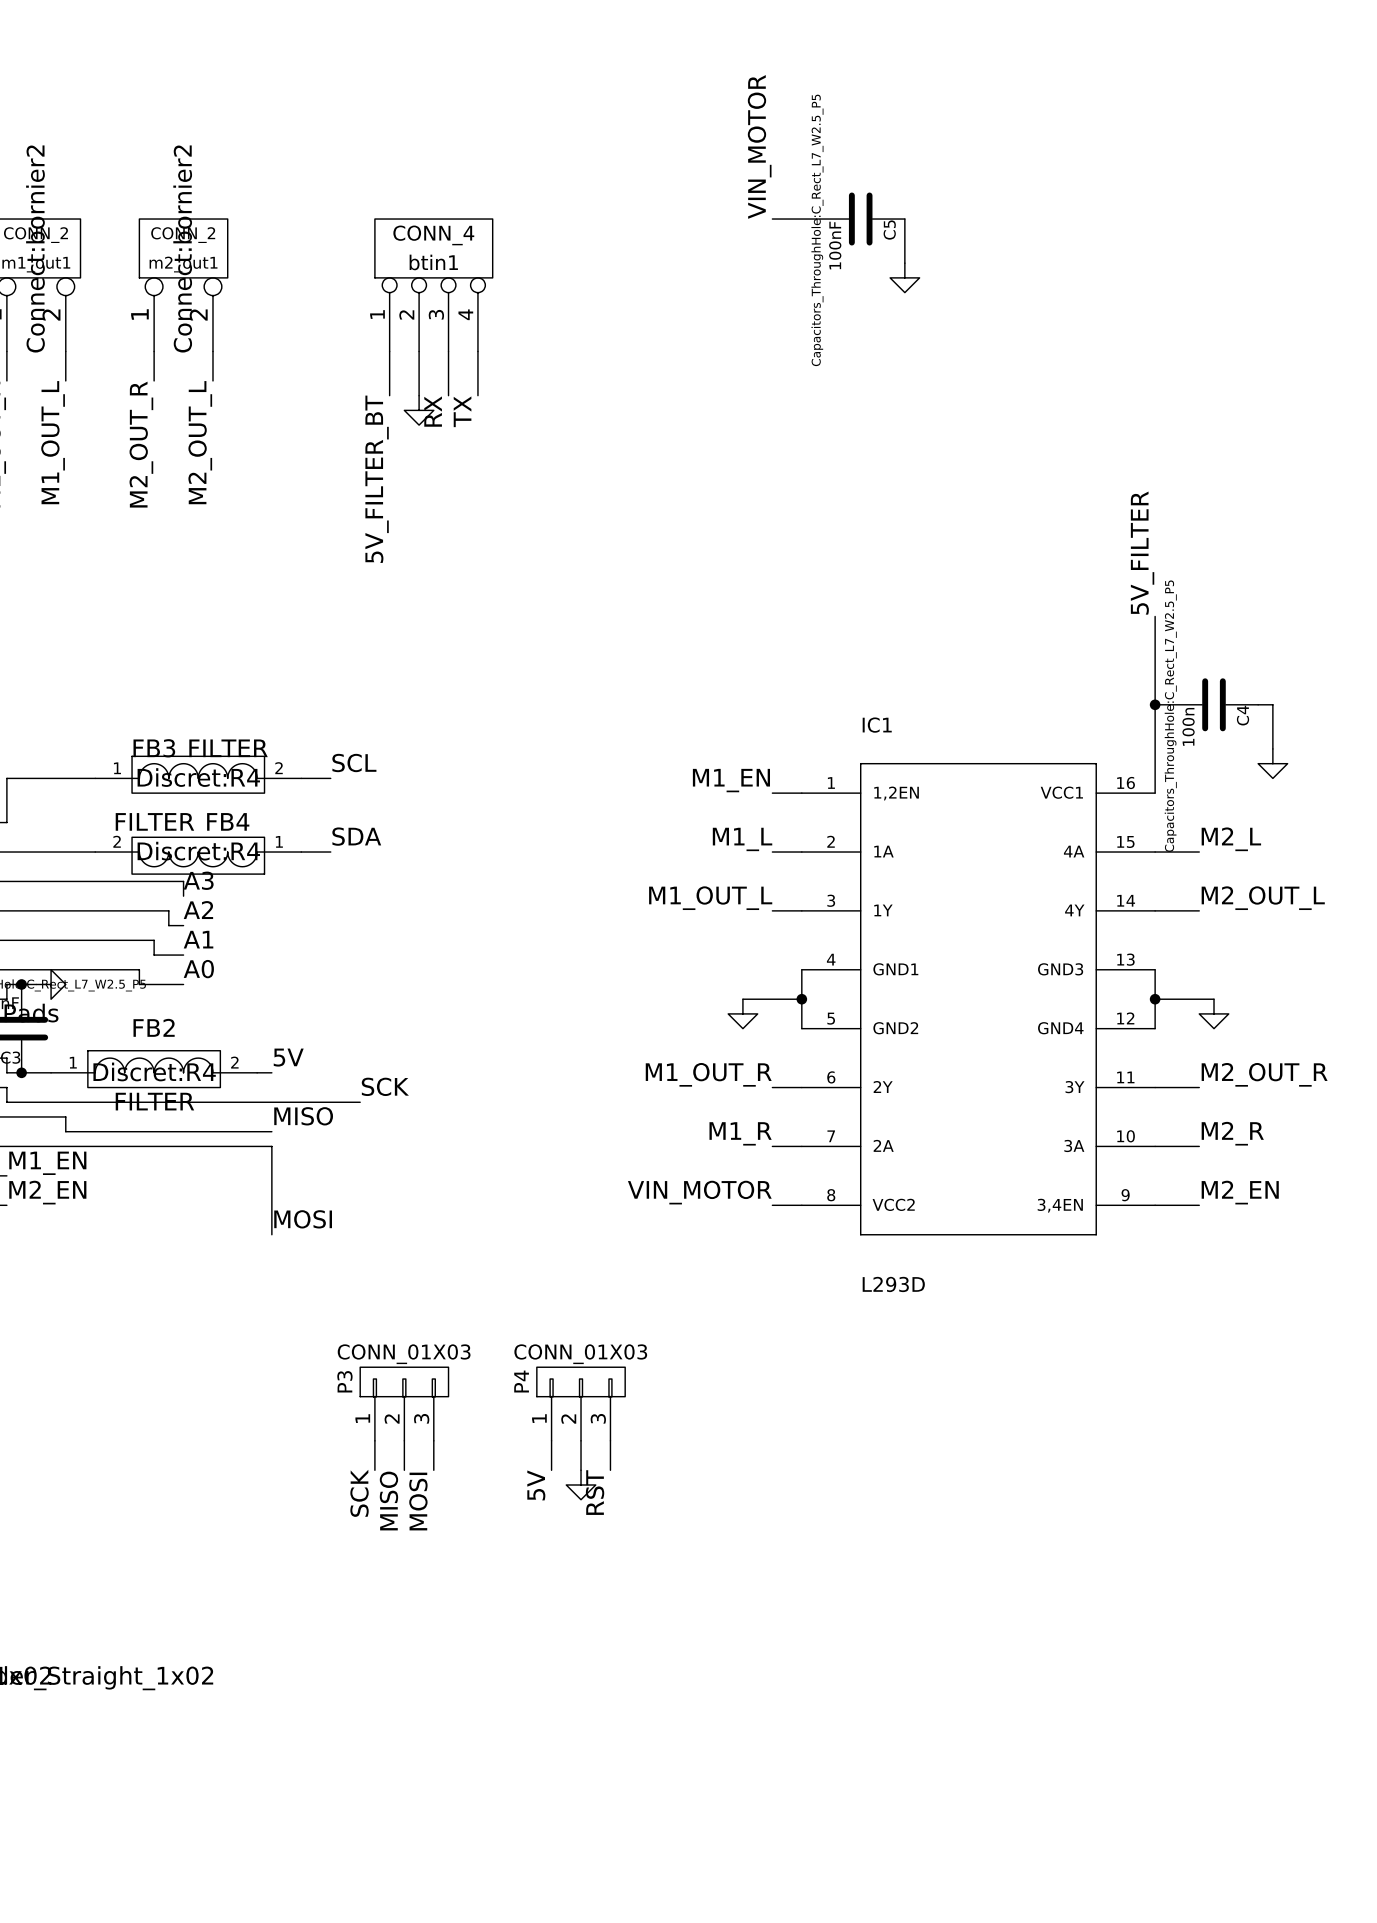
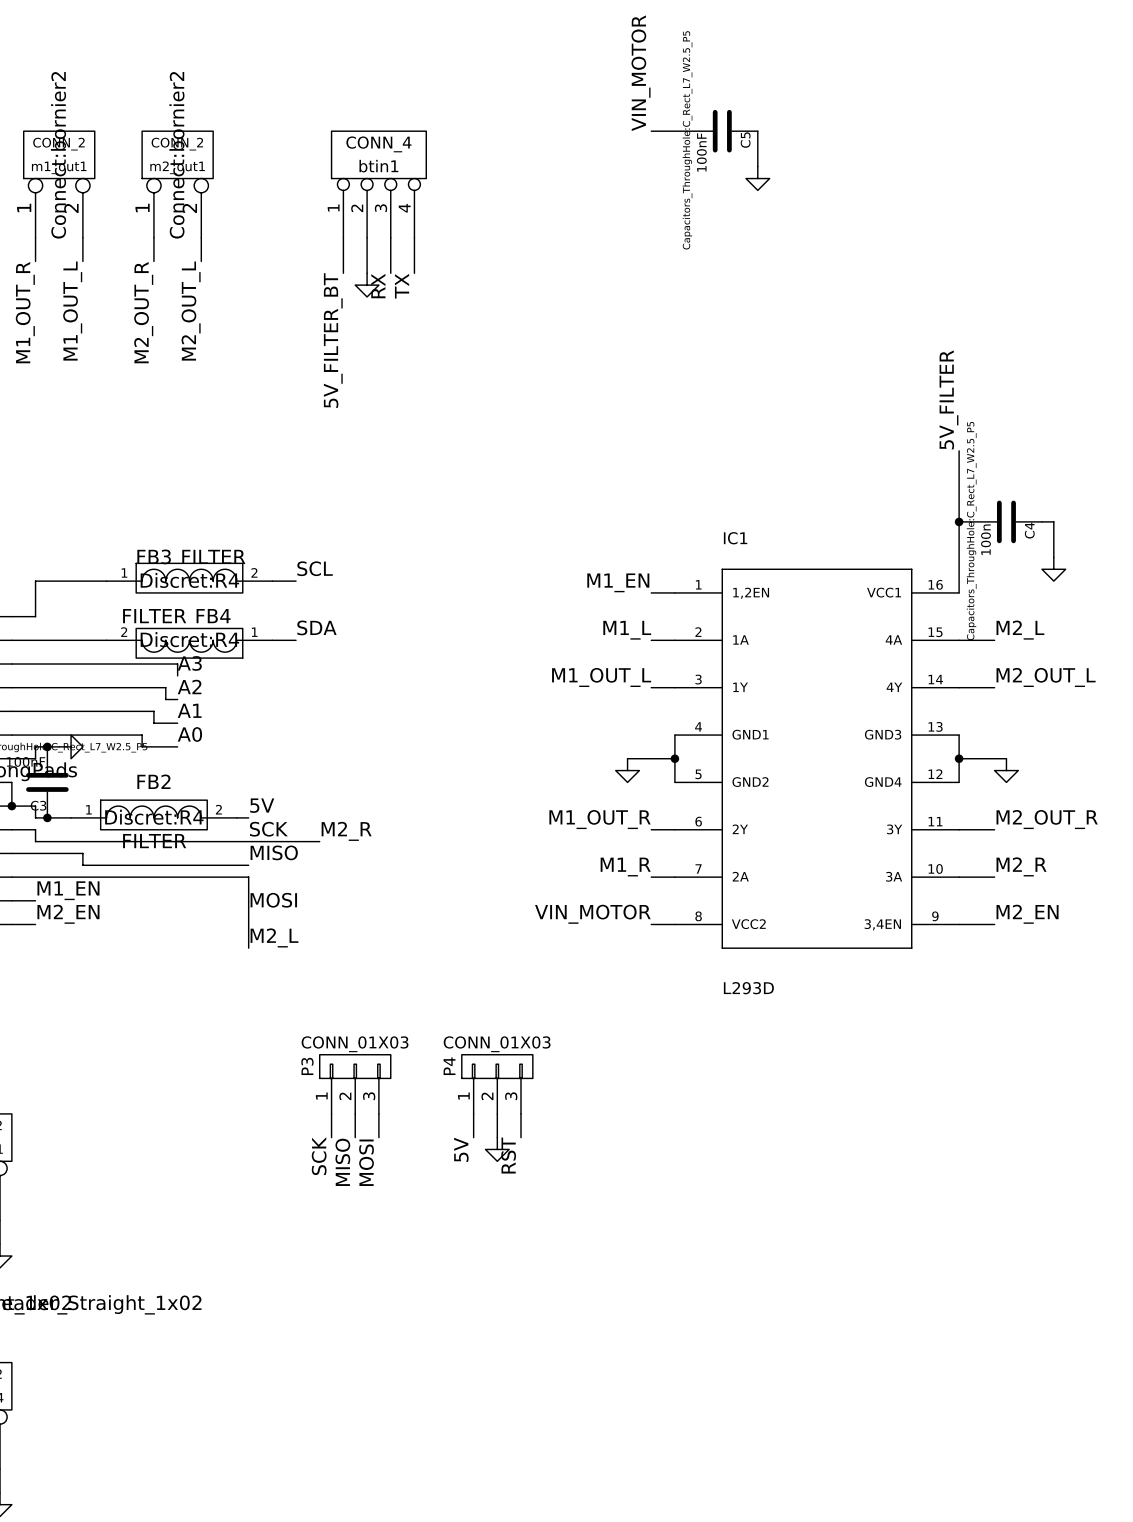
label: none -> SCK (268, 829)
label: SCK (385, 1086) -> M2_R (346, 831)
label: none -> MOSI (273, 900)
label: MOSI (303, 1219) -> M2_L (274, 937)

